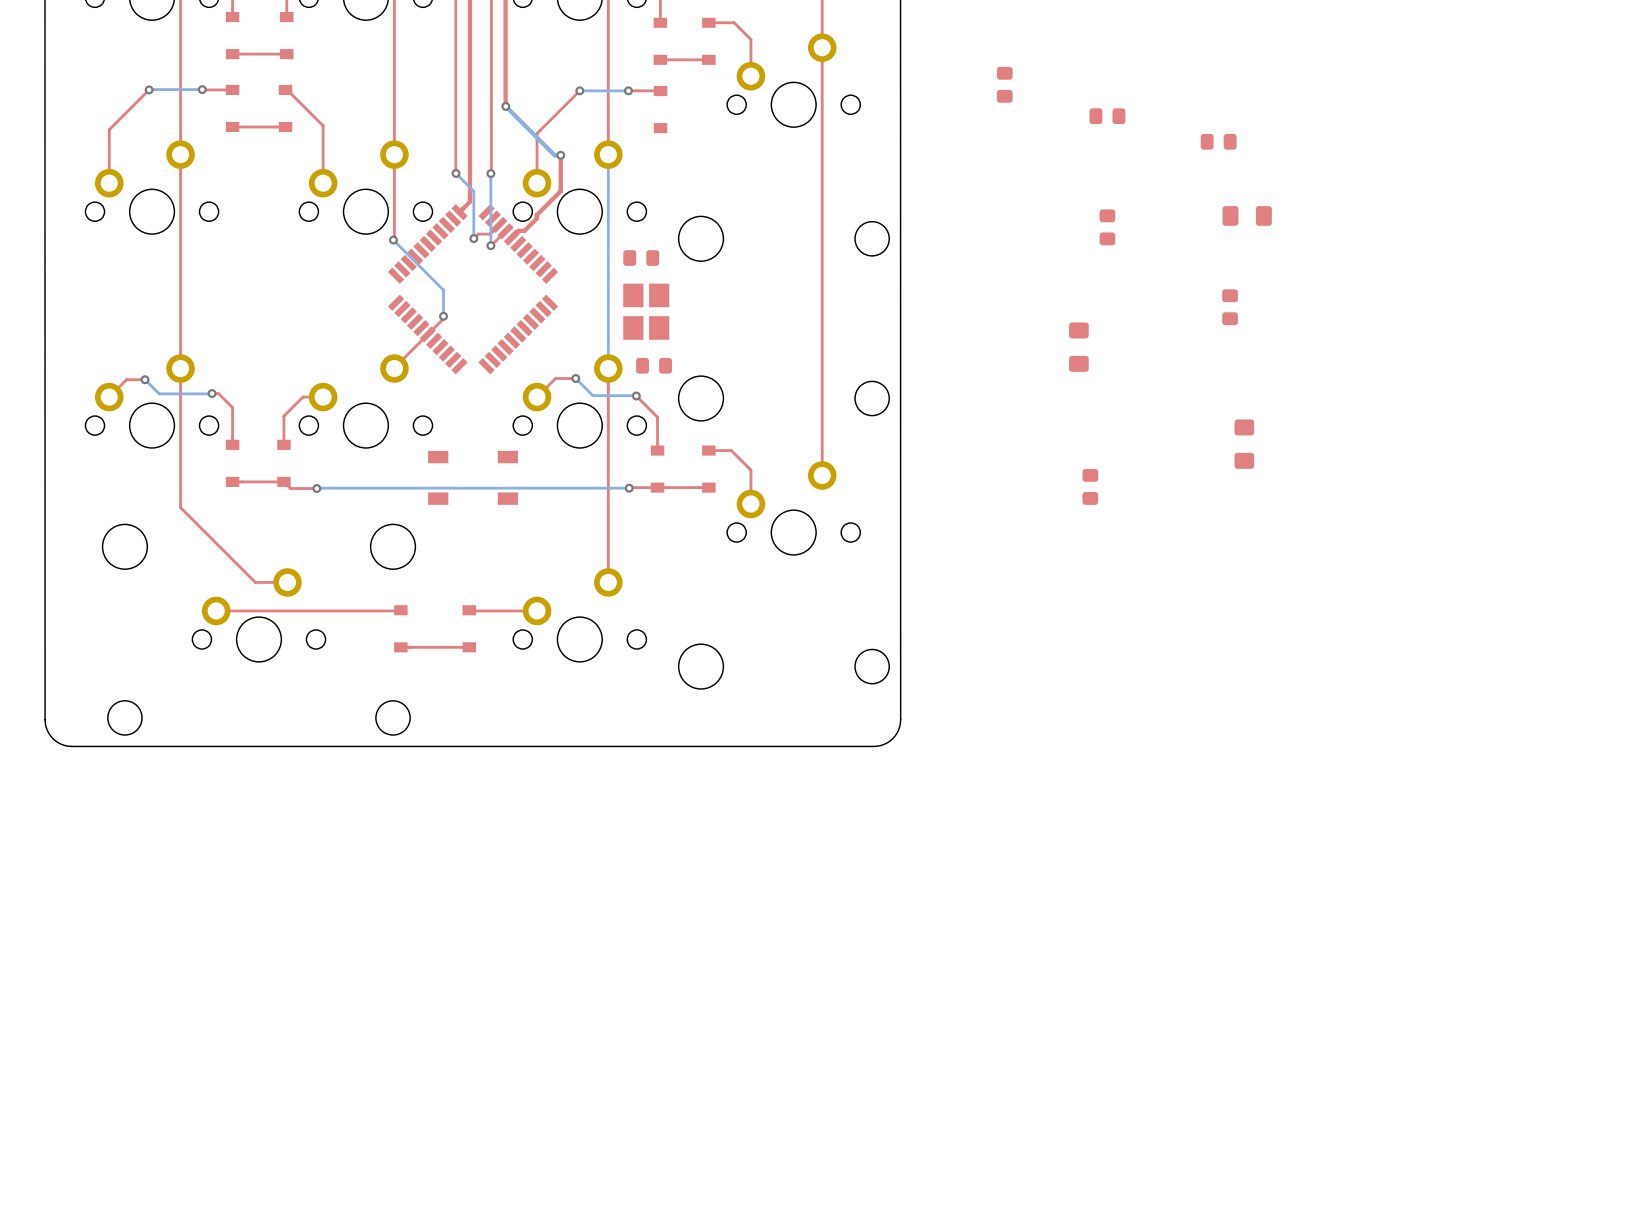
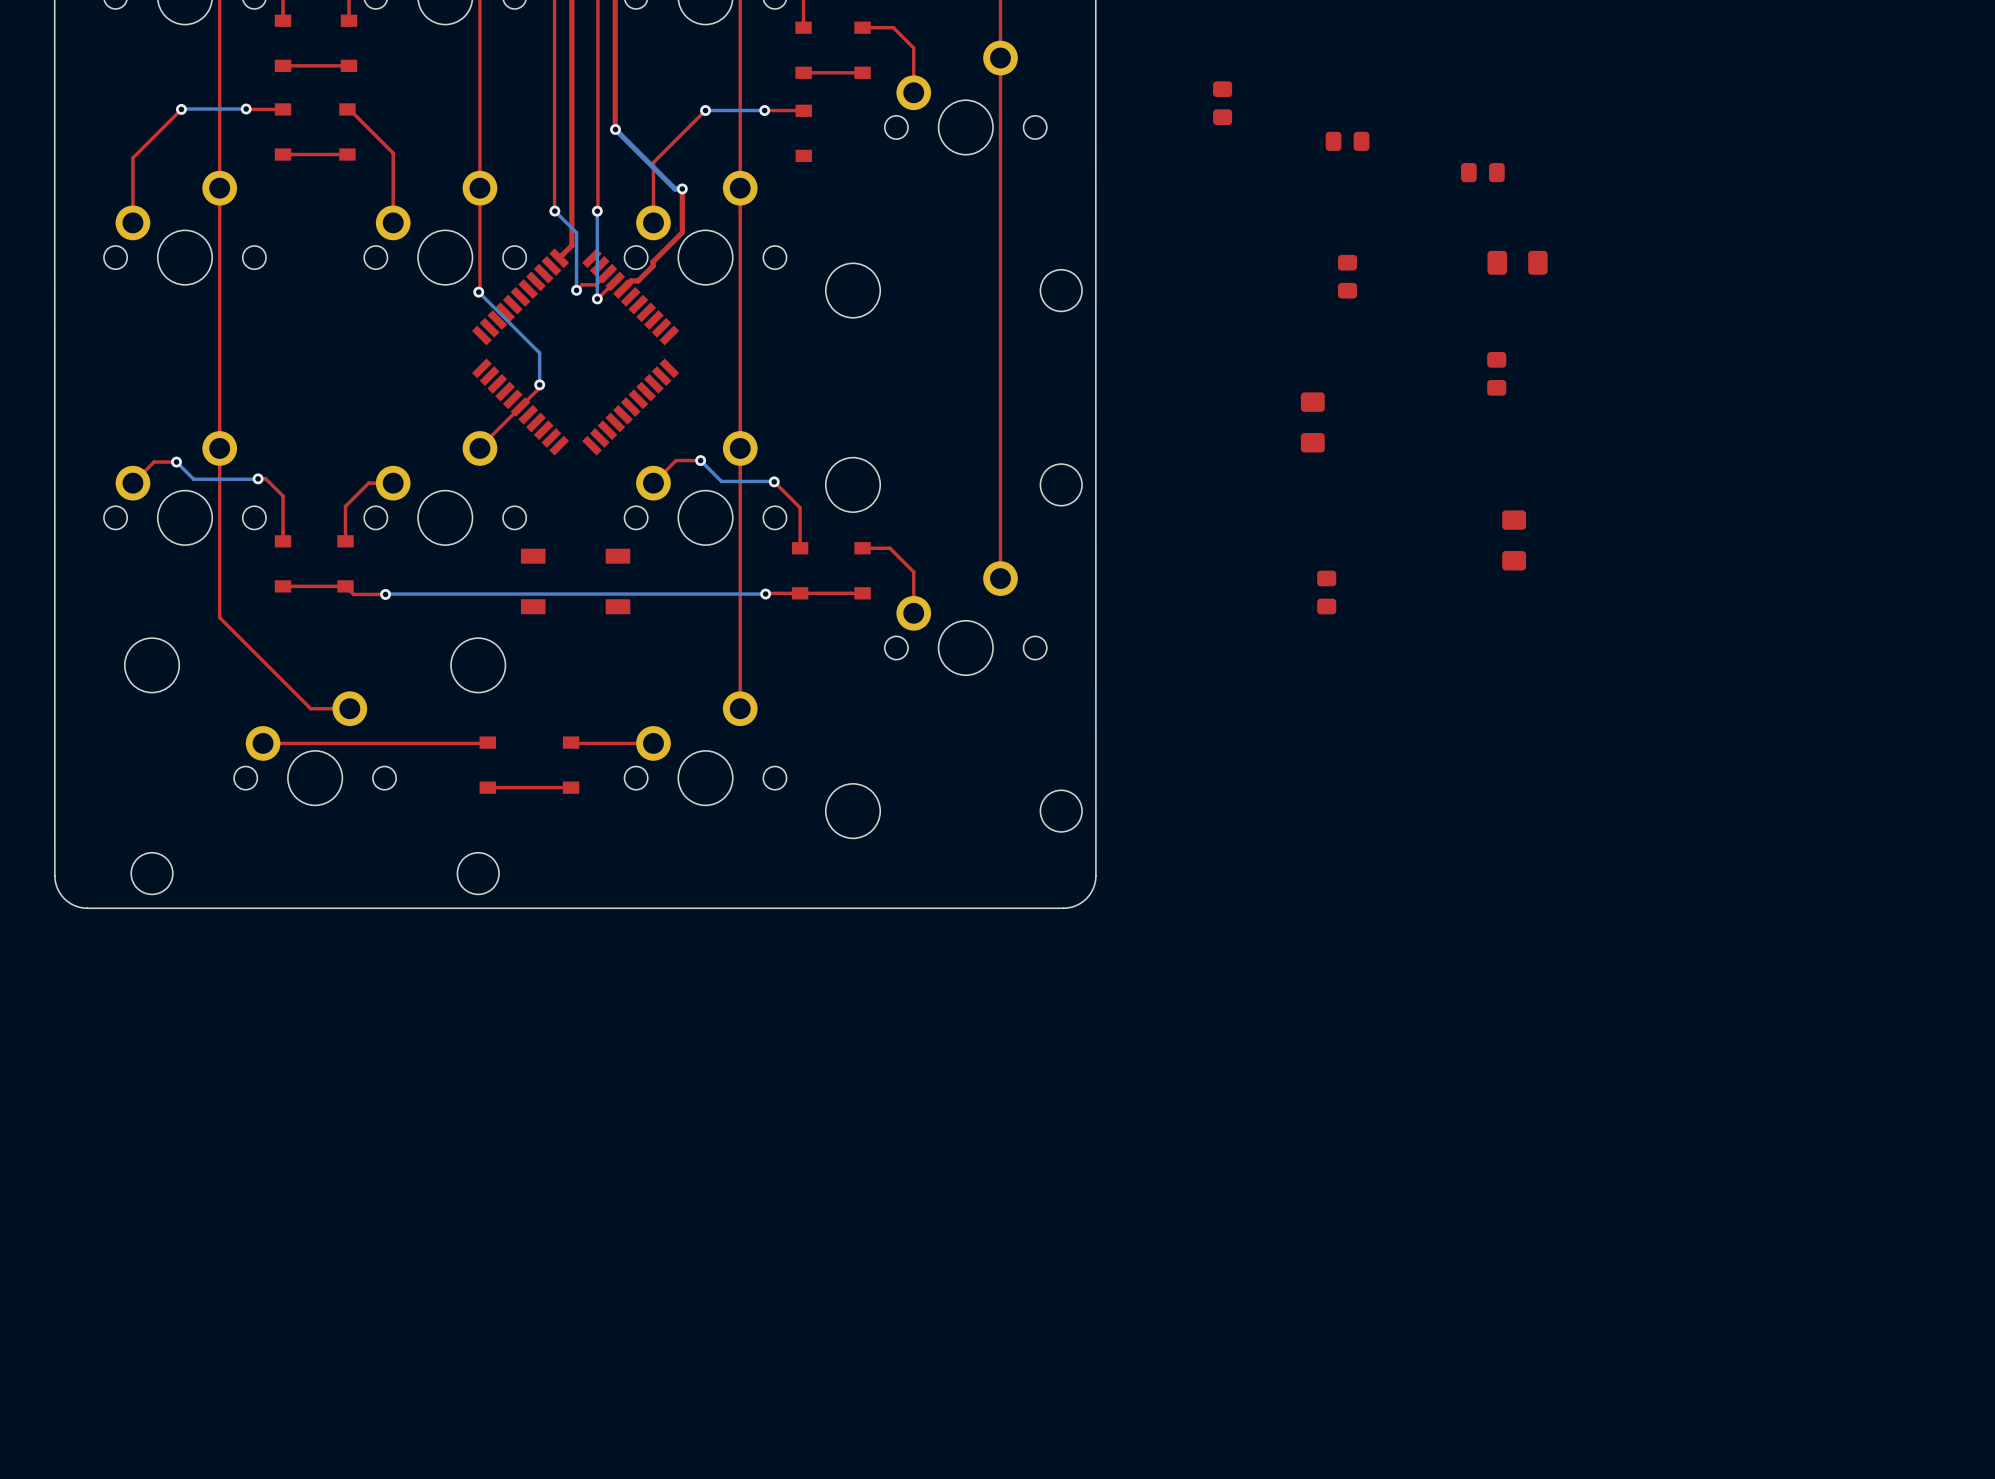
top track: none -> (740, 188) (740, 448)
bottom track: (608, 154) (608, 368) -> none
part: (641, 258) -> none
part: (646, 311) -> none
part: (654, 365) -> none

